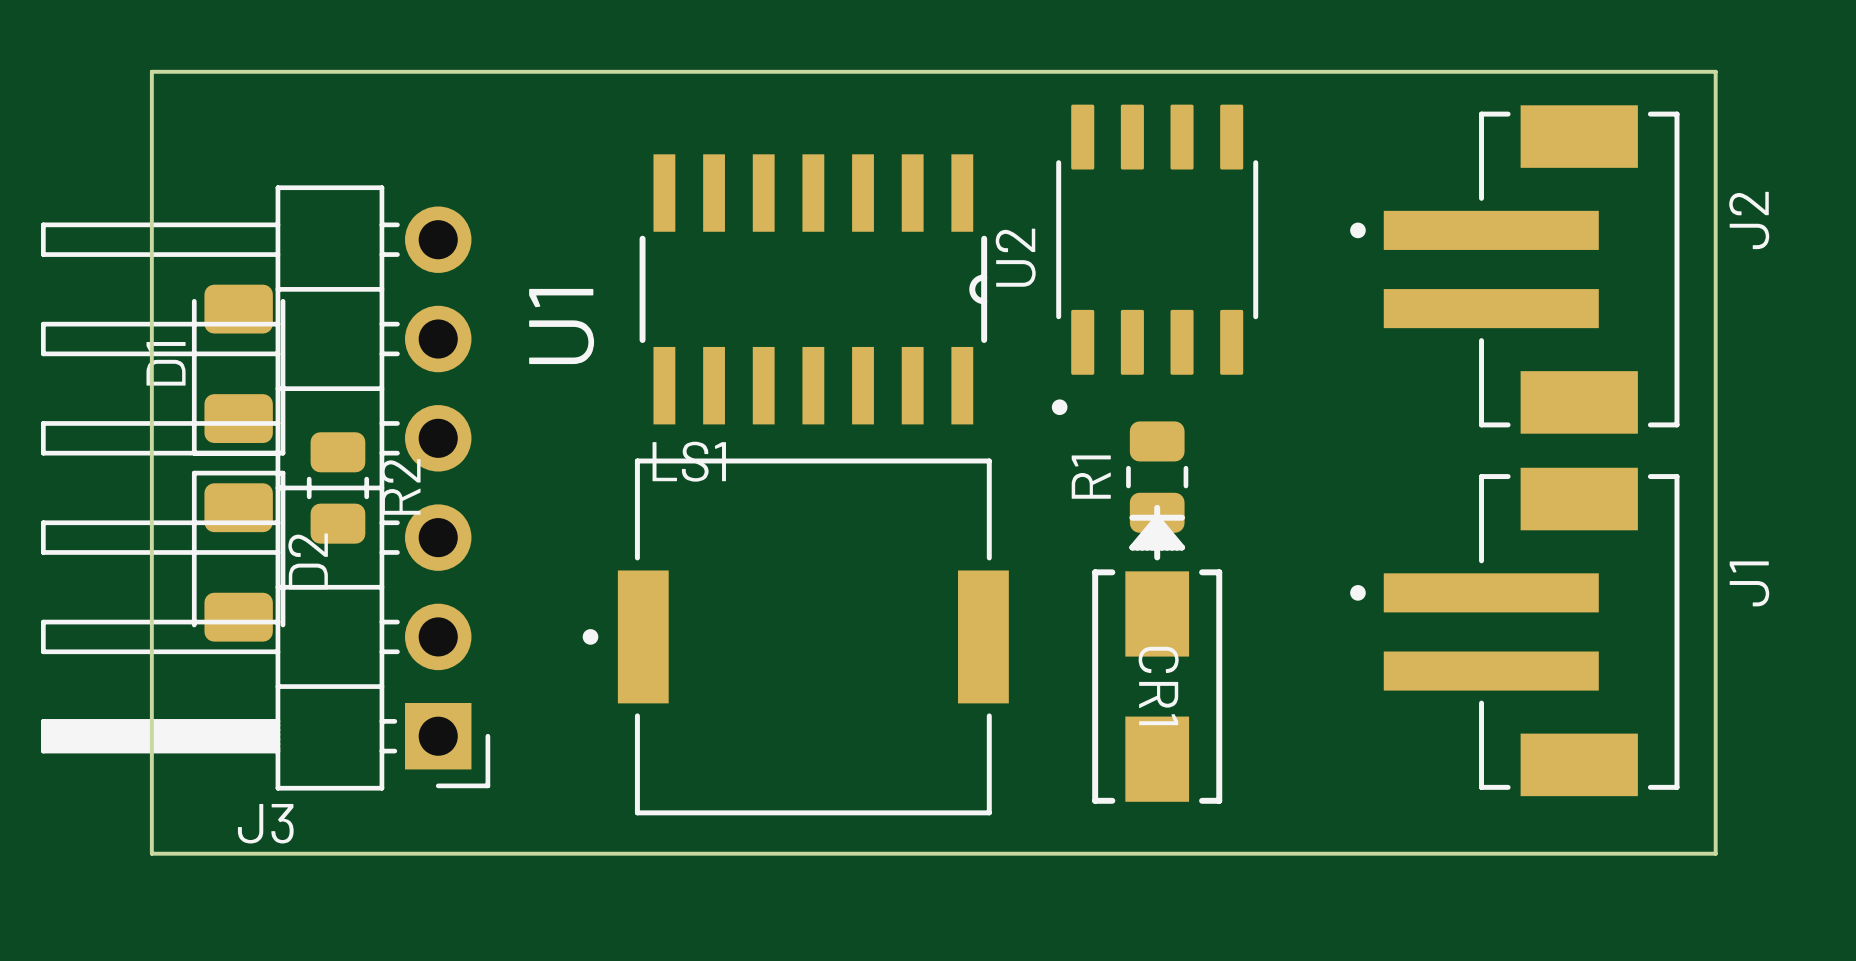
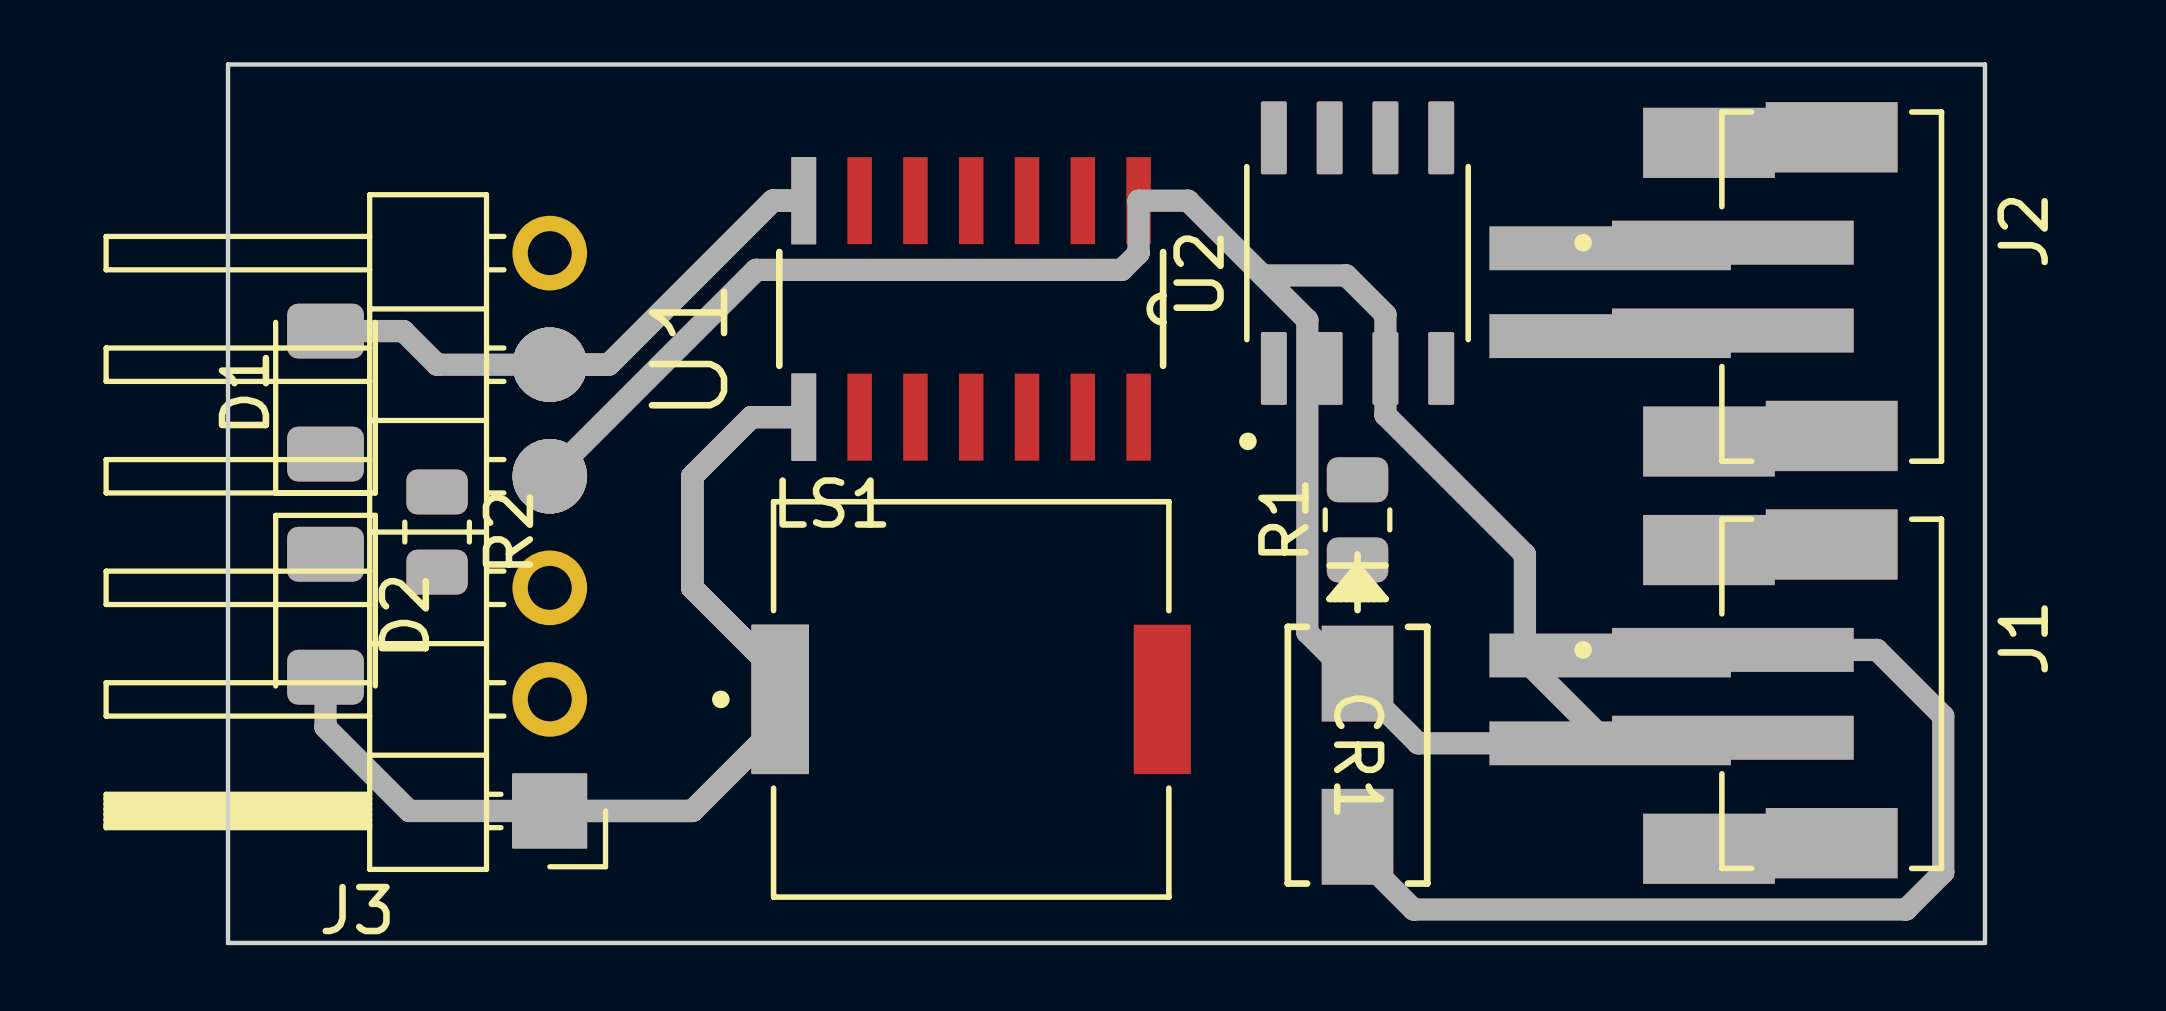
drawing: none -> [1260, 101, 1455, 175]
drawing: none -> [1260, 102, 1898, 884]
drawing: none -> [791, 157, 817, 245]
line: none -> (803, 200) (772, 200) (608, 364) (437, 364) (403, 331) (325, 331)
line: none -> (1262, 275) (1346, 275) (1385, 314) (1385, 414) (1524, 554) (1524, 660) (1602, 737) (1732, 737)
drawing: none -> [287, 303, 364, 359]
drawing: none -> [287, 327, 588, 595]
drawing: none -> [791, 373, 817, 461]
line: none -> (803, 417) (751, 417) (692, 476) (692, 587) (780, 675) (780, 723) (692, 810) (409, 810) (325, 727) (325, 677)
line: none -> (549, 476) (756, 269) (1121, 269) (1138, 253) (1138, 200) (1187, 200) (1307, 320) (1307, 632) (1418, 743) (1610, 743)
drawing: none -> [751, 624, 809, 775]
drawing: none -> [287, 649, 364, 705]
line: none -> (1732, 649) (1877, 649) (1943, 716) (1943, 872) (1906, 909) (1413, 909) (1357, 853) (1357, 836)
drawing: none -> [512, 773, 588, 849]
drawing: none -> [1321, 788, 1394, 885]

